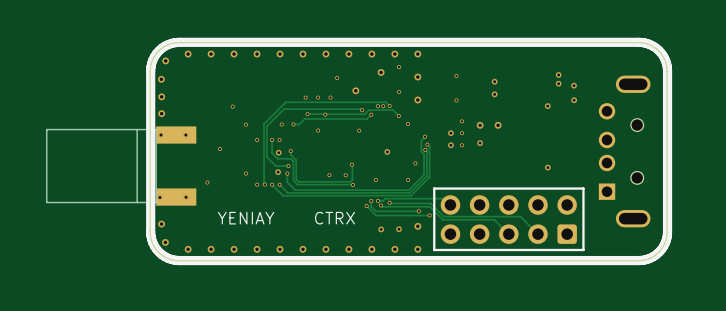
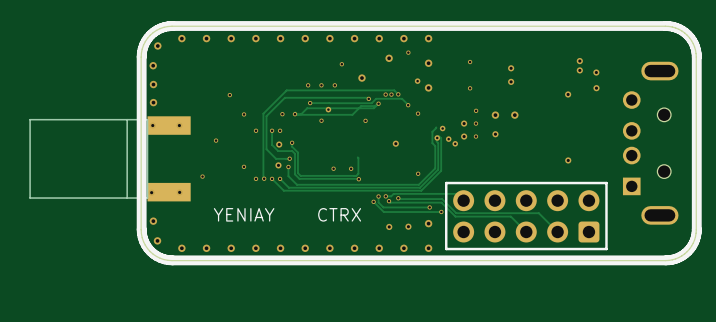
via: (399, 92) -> none
via: none -> (417, 81)
via: (325, 114) -> none
track: none -> (376, 104) (361, 106) (352, 114) (297, 114) (295, 112)
via: none -> (328, 109)
via: (424, 136) -> none
via: none -> (442, 128)
via: (427, 144) -> none
via: none -> (437, 138)
via: none -> (448, 139)
via: (425, 149) -> none
via: none -> (455, 143)
via: (415, 163) -> none
via: (351, 164) -> none
via: (375, 179) -> none

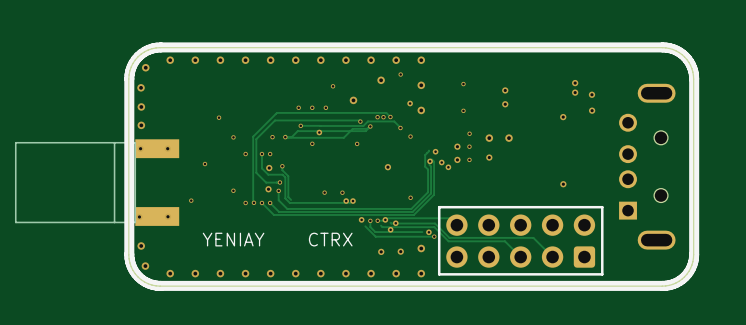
track: (357, 157) (358, 173) (356, 175) (300, 175) -> none
via: none -> (346, 201)
via: none -> (352, 201)
via: (358, 179) -> none
via: none -> (361, 219)
via: none -> (385, 219)
via: (398, 198) -> none
via: none -> (395, 223)
via: (373, 201) -> none
via: (388, 201) -> none
via: none -> (390, 229)
via: (429, 207) -> none
via: none -> (428, 232)

